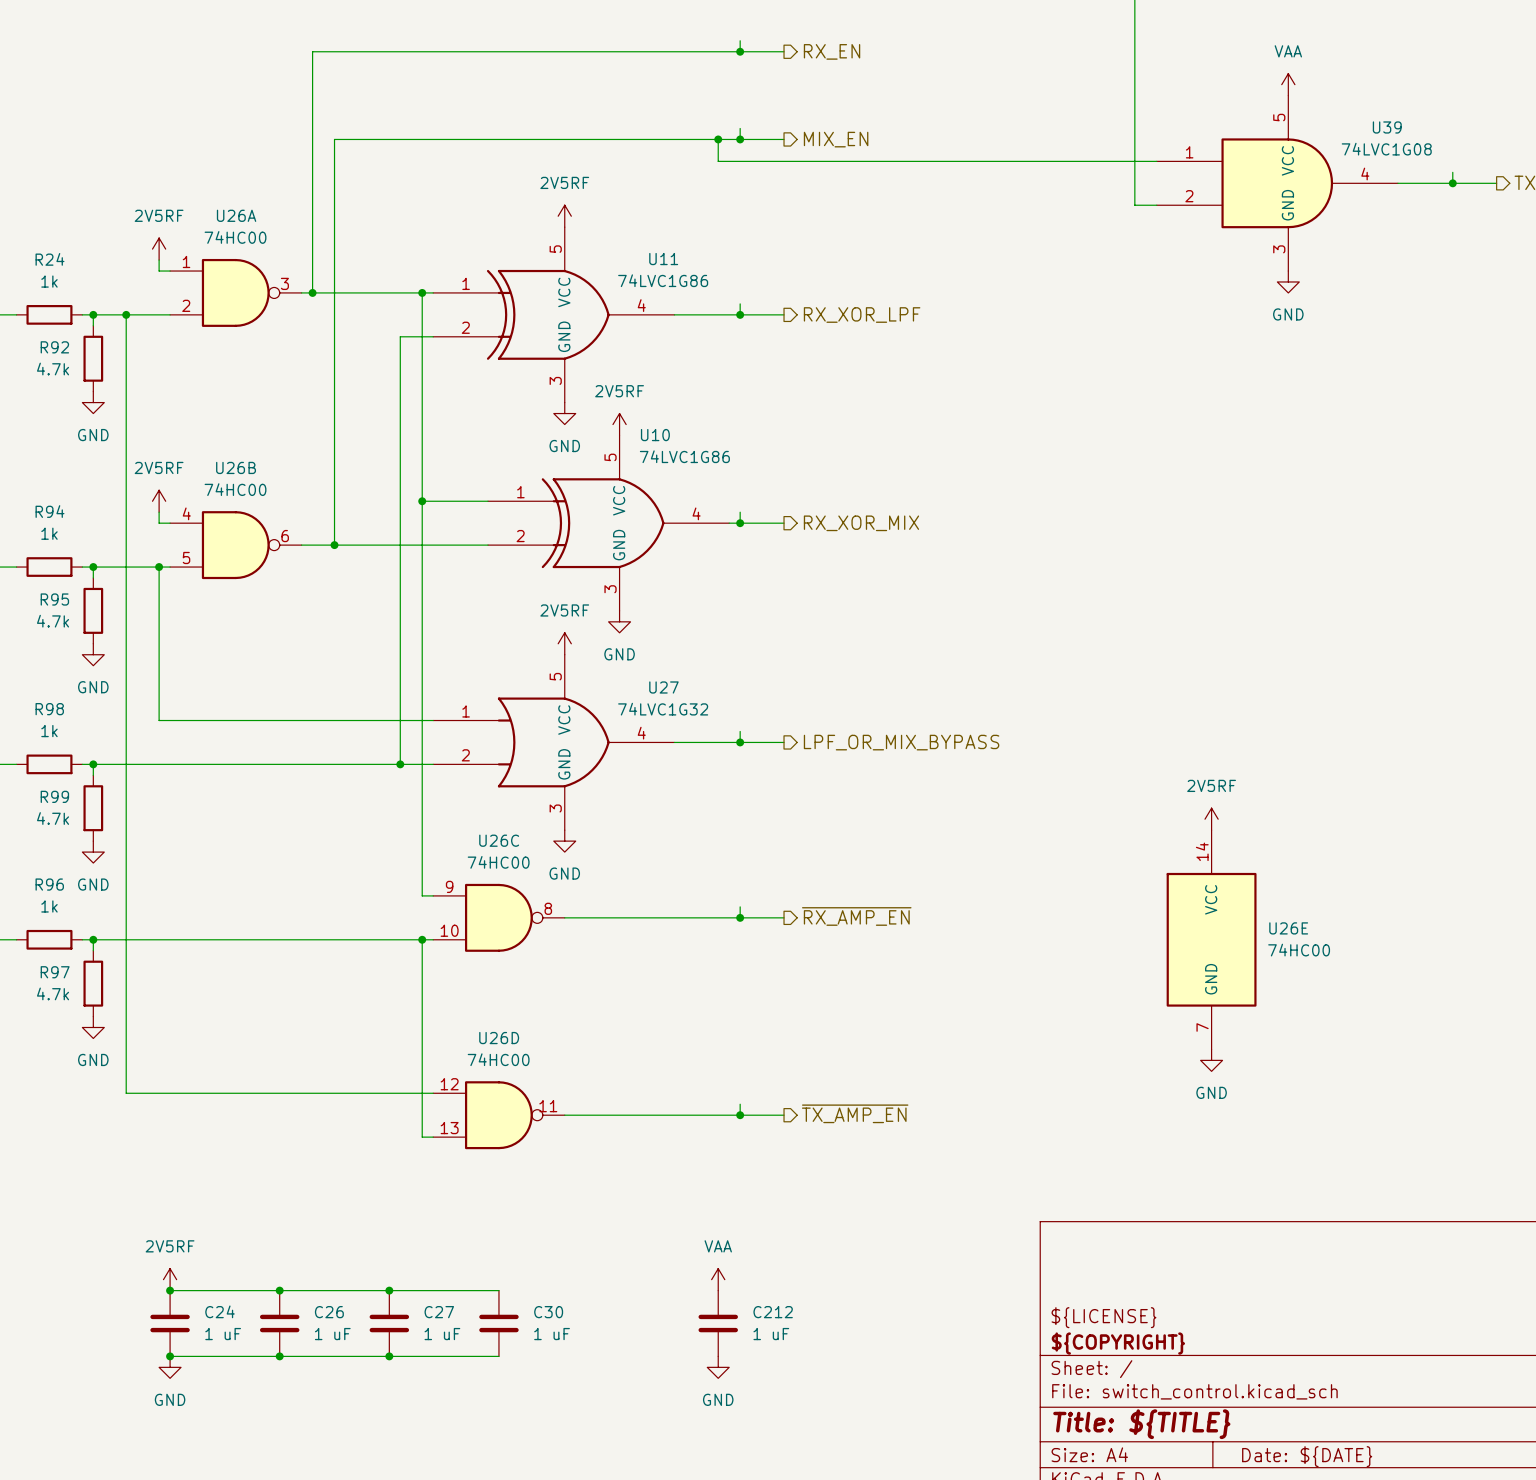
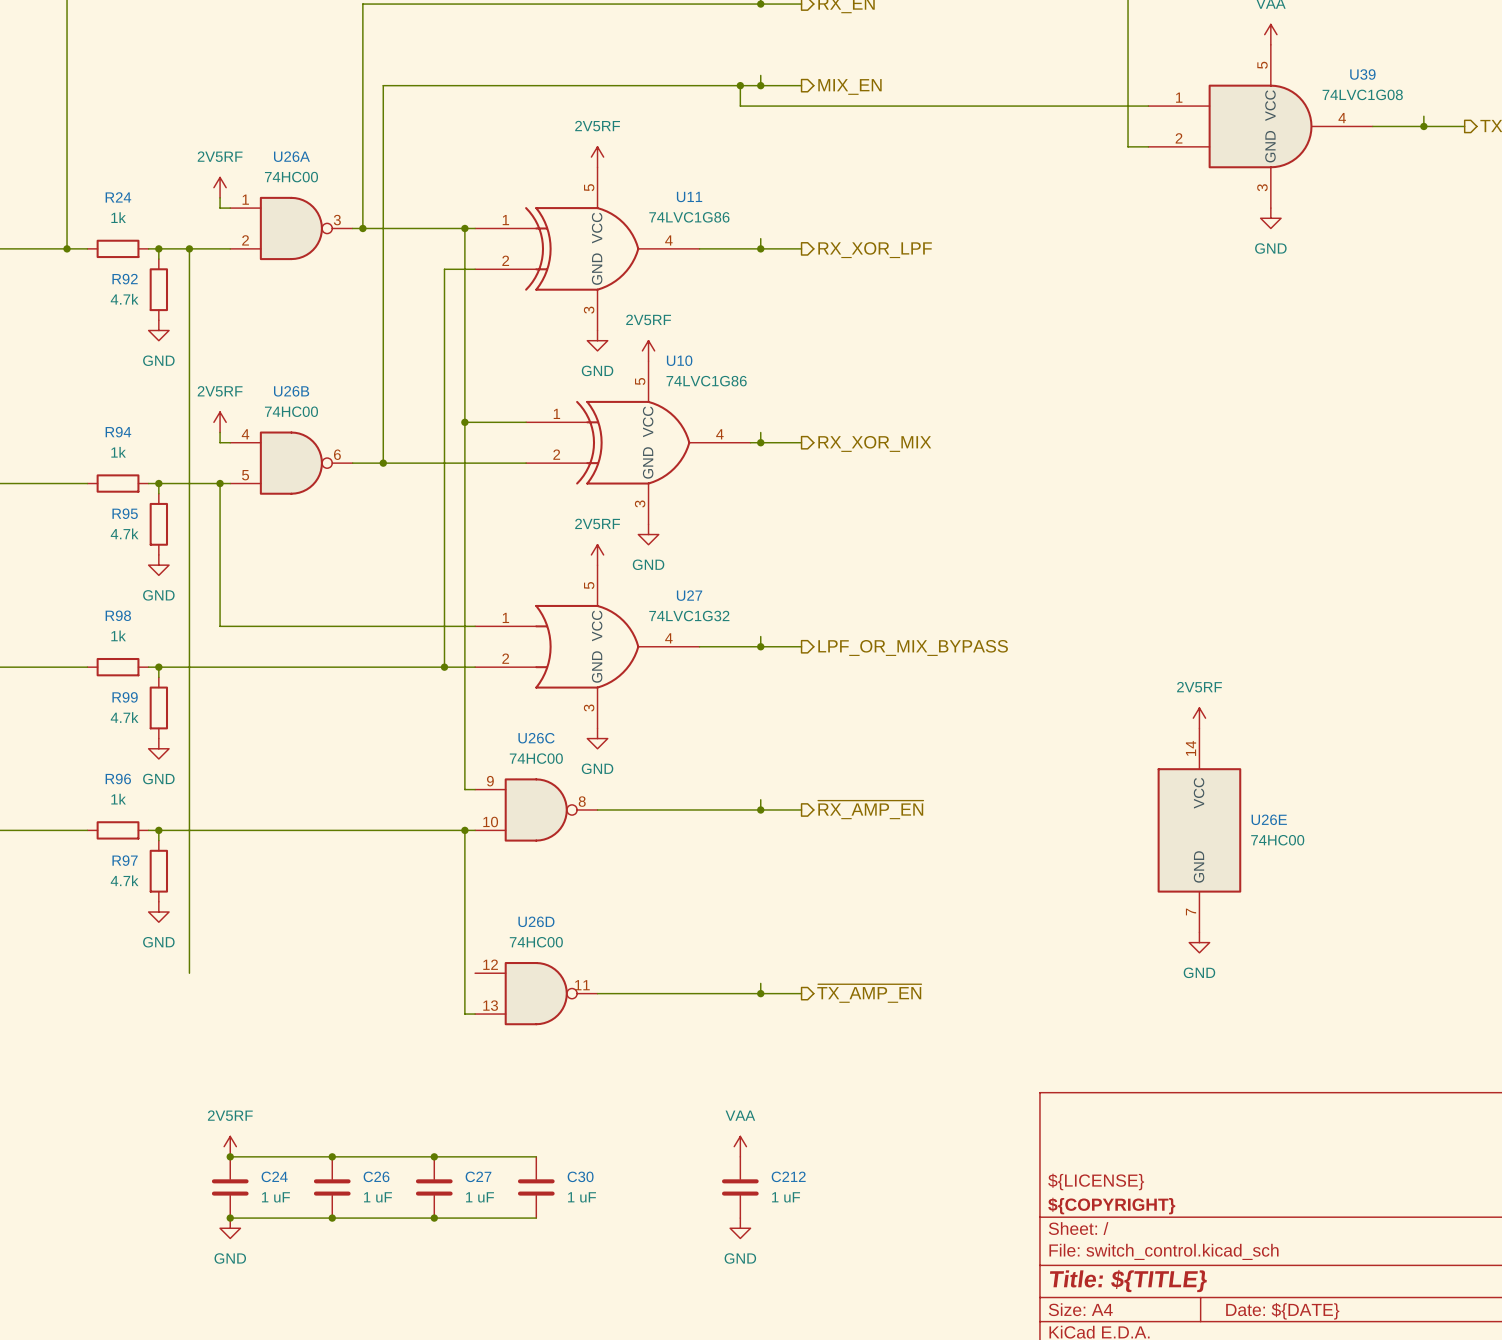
wire: (126, 1093) (433, 1093) -> none

